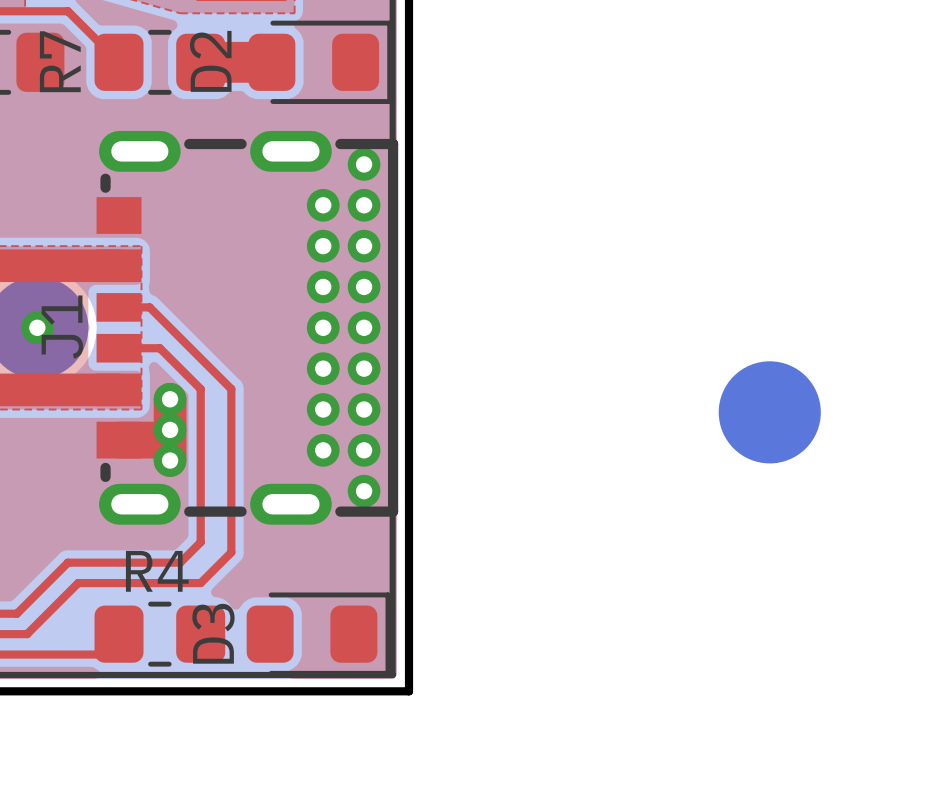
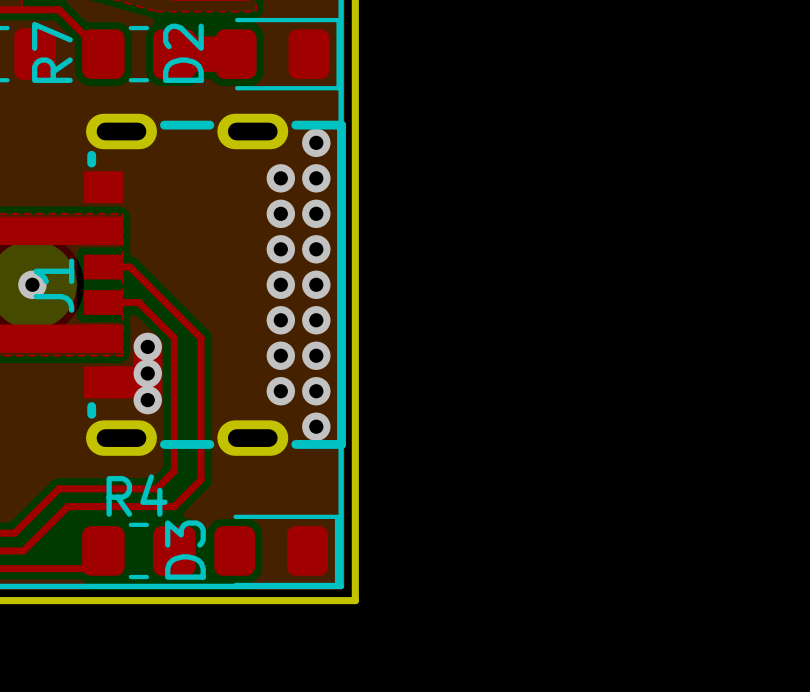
part: (769, 412) -> none

